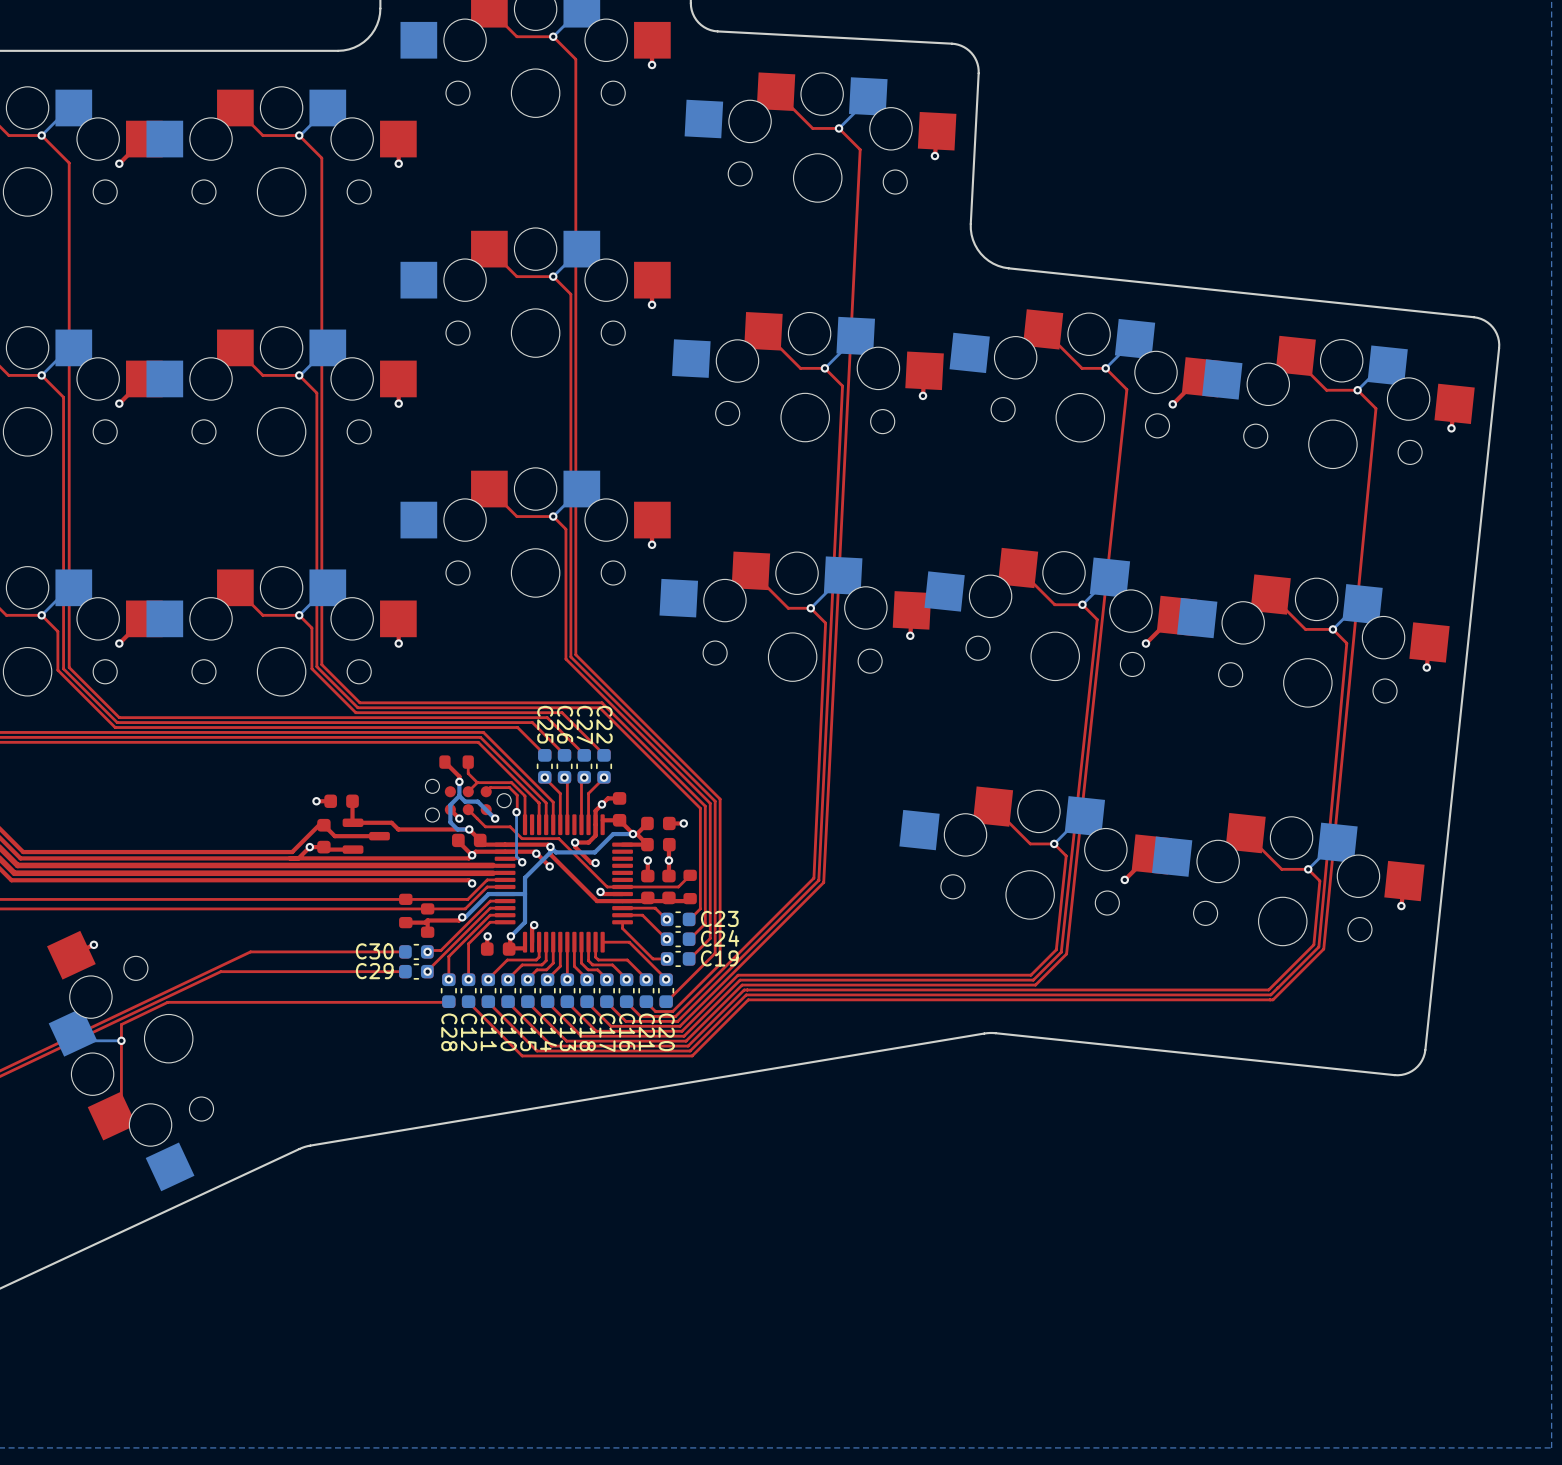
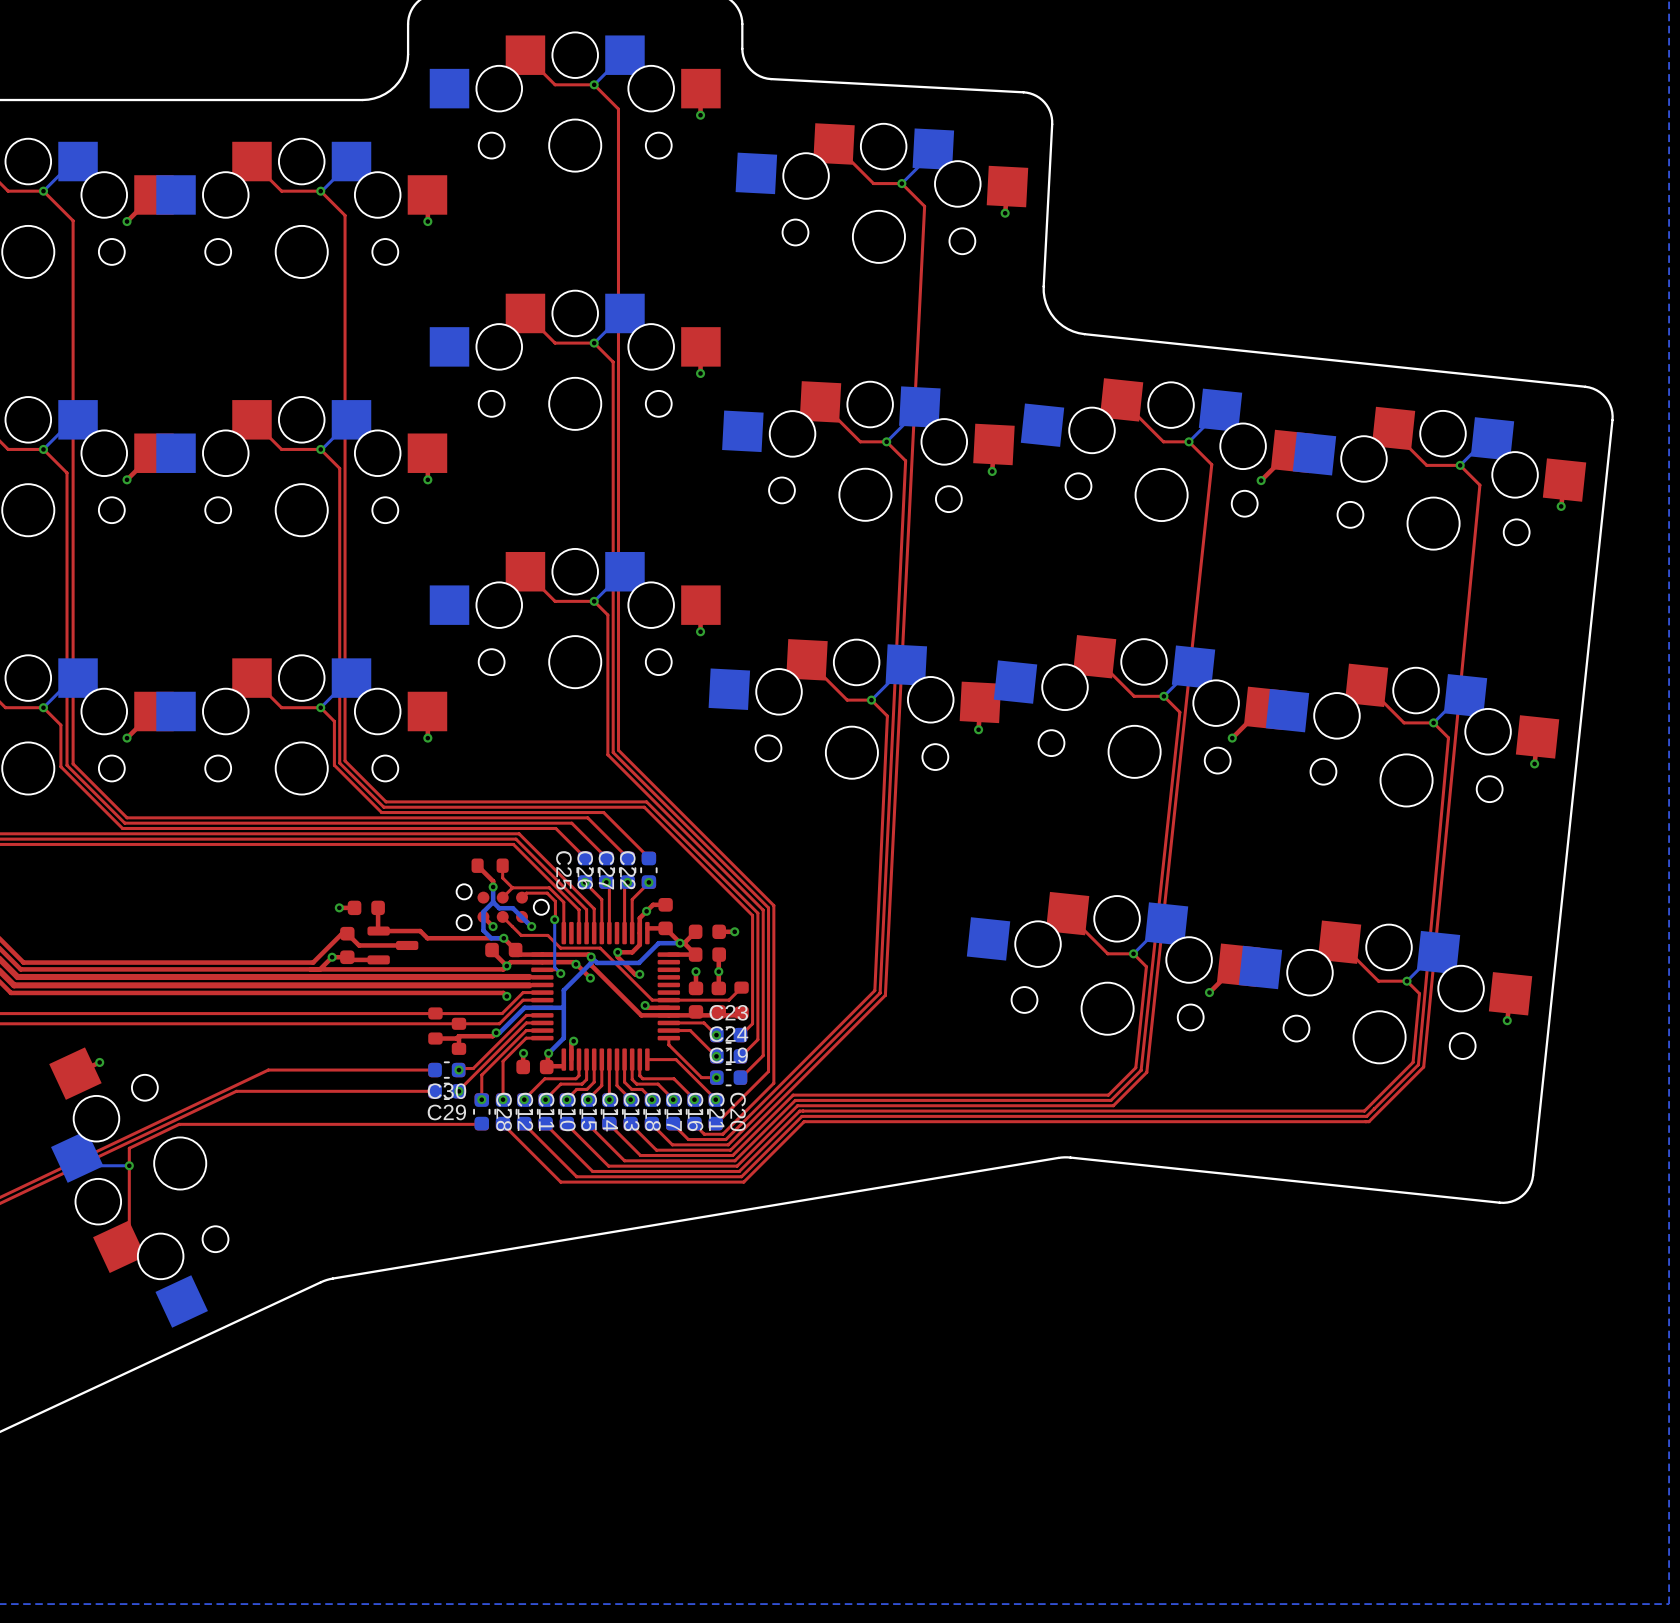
C25 name position: C25 (545, 724) -> C25 (563, 870)
C26 name position: C26 (565, 724) -> C26 (585, 870)
C22 name position: C22 (604, 724) -> C22 (627, 870)
C27 name position: C27 (584, 725) -> C27 (606, 870)
C23 name position: C23 (719, 918) -> C23 (728, 1012)
C24 name position: C24 (720, 938) -> C24 (728, 1034)
C30 name position: C30 (374, 951) -> C30 (446, 1091)
C19 name position: C19 (719, 958) -> C19 (728, 1055)
C29 name position: C29 (374, 971) -> C29 (446, 1112)
C28 name position: C28 (449, 1032) -> C28 (504, 1111)
C12 name position: C12 (469, 1032) -> C12 (525, 1111)
C11 name position: C11 (488, 1032) -> C11 (546, 1111)
C10 name position: C10 (508, 1032) -> C10 (567, 1111)
C15 name position: C15 (528, 1032) -> C15 (589, 1111)
C14 name position: C14 (548, 1032) -> C14 (610, 1112)
C13 name position: C13 (567, 1032) -> C13 (631, 1111)
C18 name position: C18 (587, 1032) -> C18 (652, 1111)
C17 name position: C17 (607, 1032) -> C17 (674, 1111)
C16 name position: C16 (627, 1032) -> C16 (695, 1111)
C21 name position: C21 (646, 1032) -> C21 (716, 1111)
C20 name position: C20 (666, 1032) -> C20 (738, 1111)

